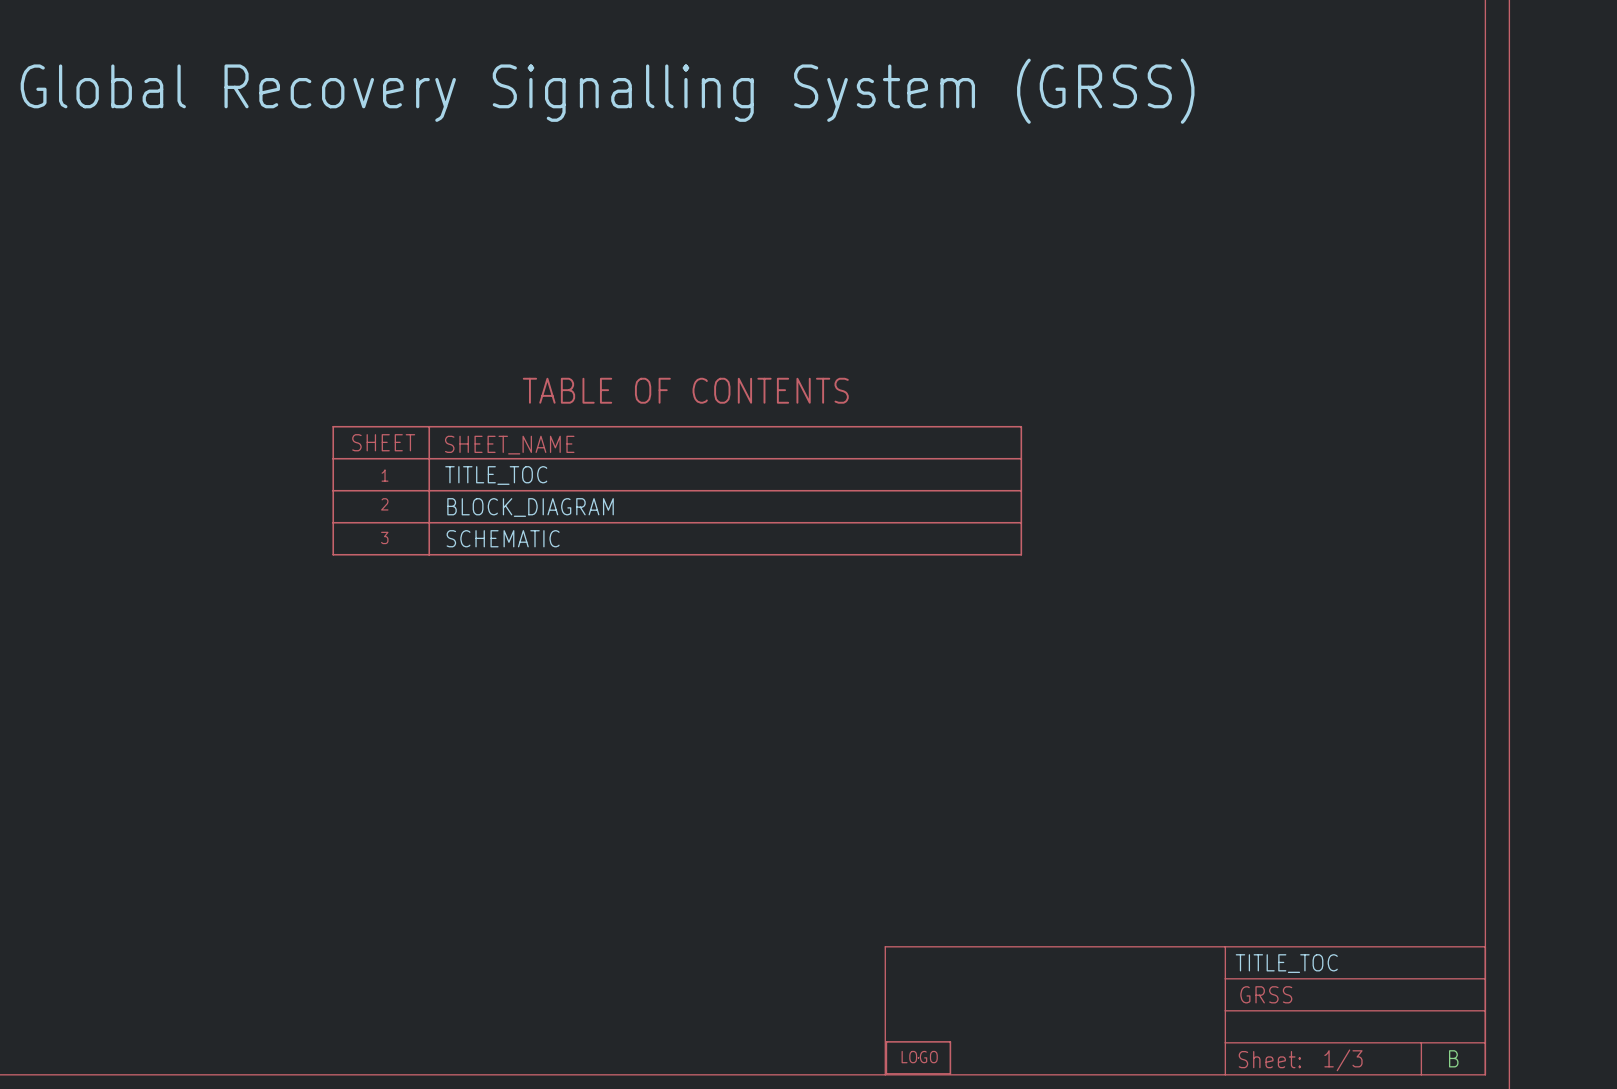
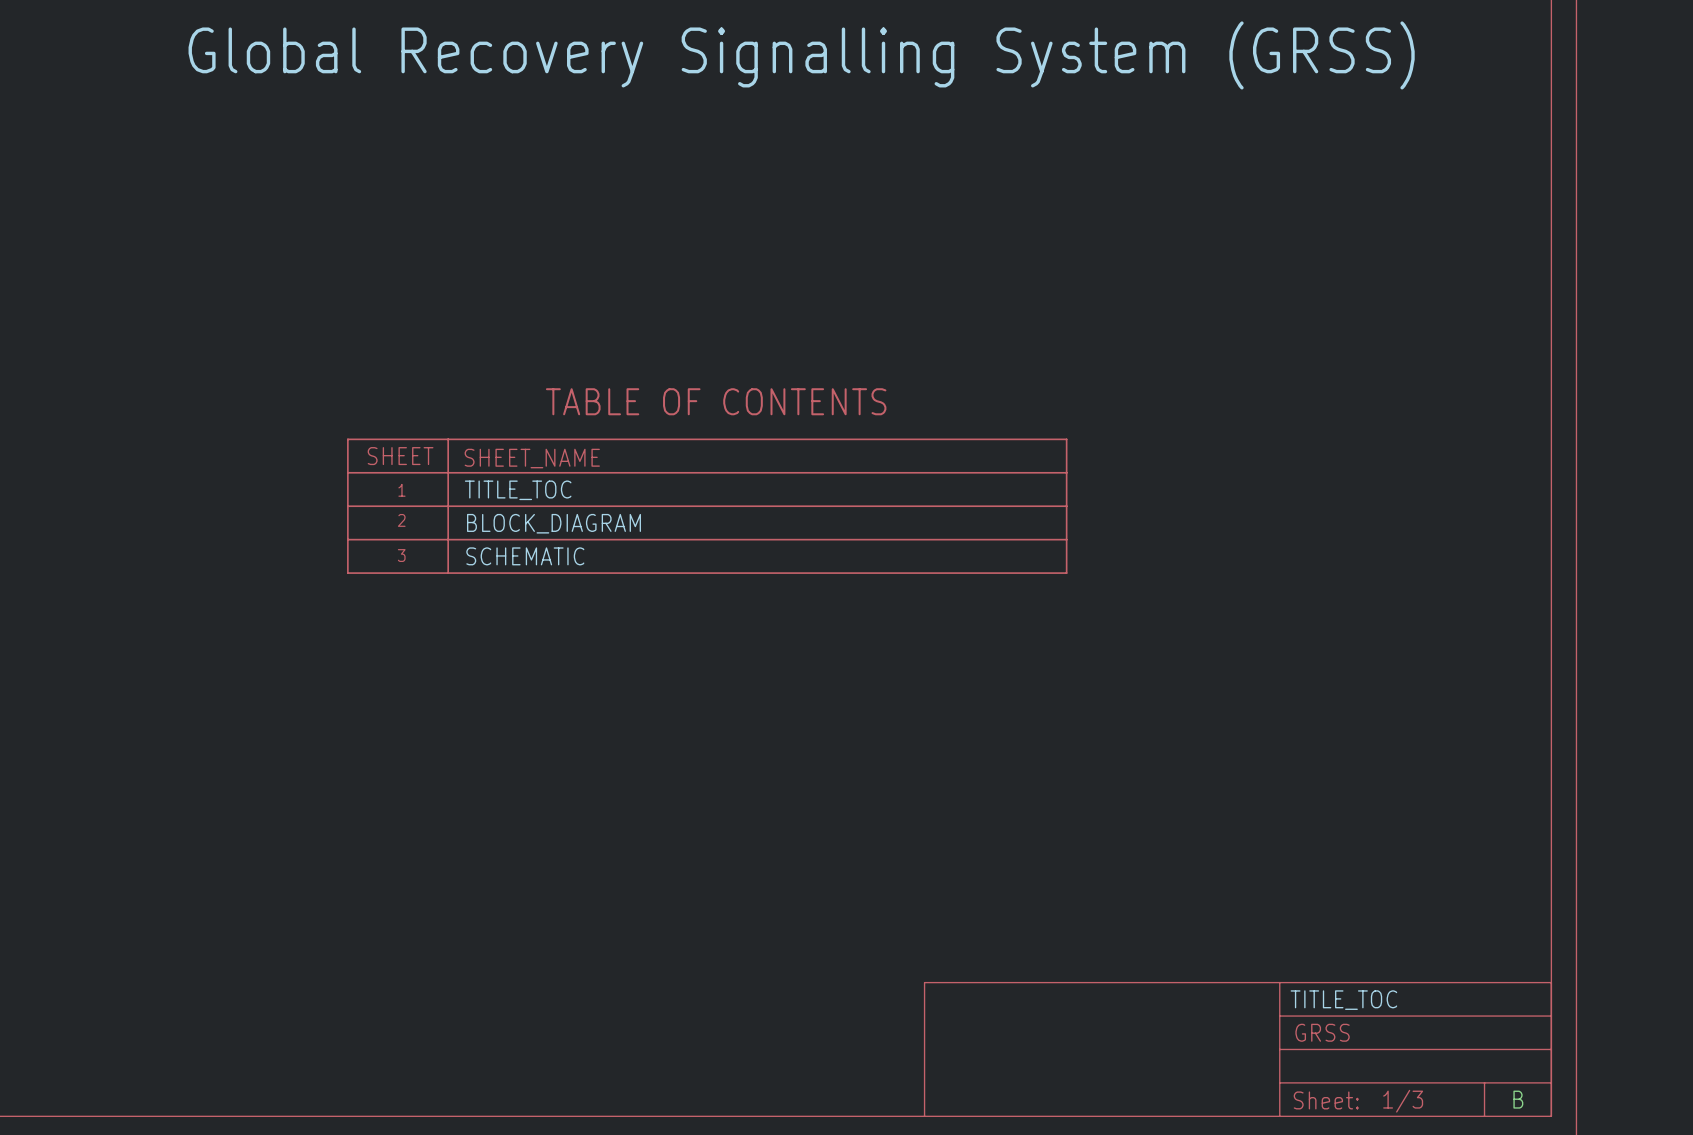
text: none -> Global Recovery Signalling System (GRSS) (801, 55)
text: Global Recovery Signalling System (GRSS) (607, 91) -> none
part: (918, 1057) -> none

